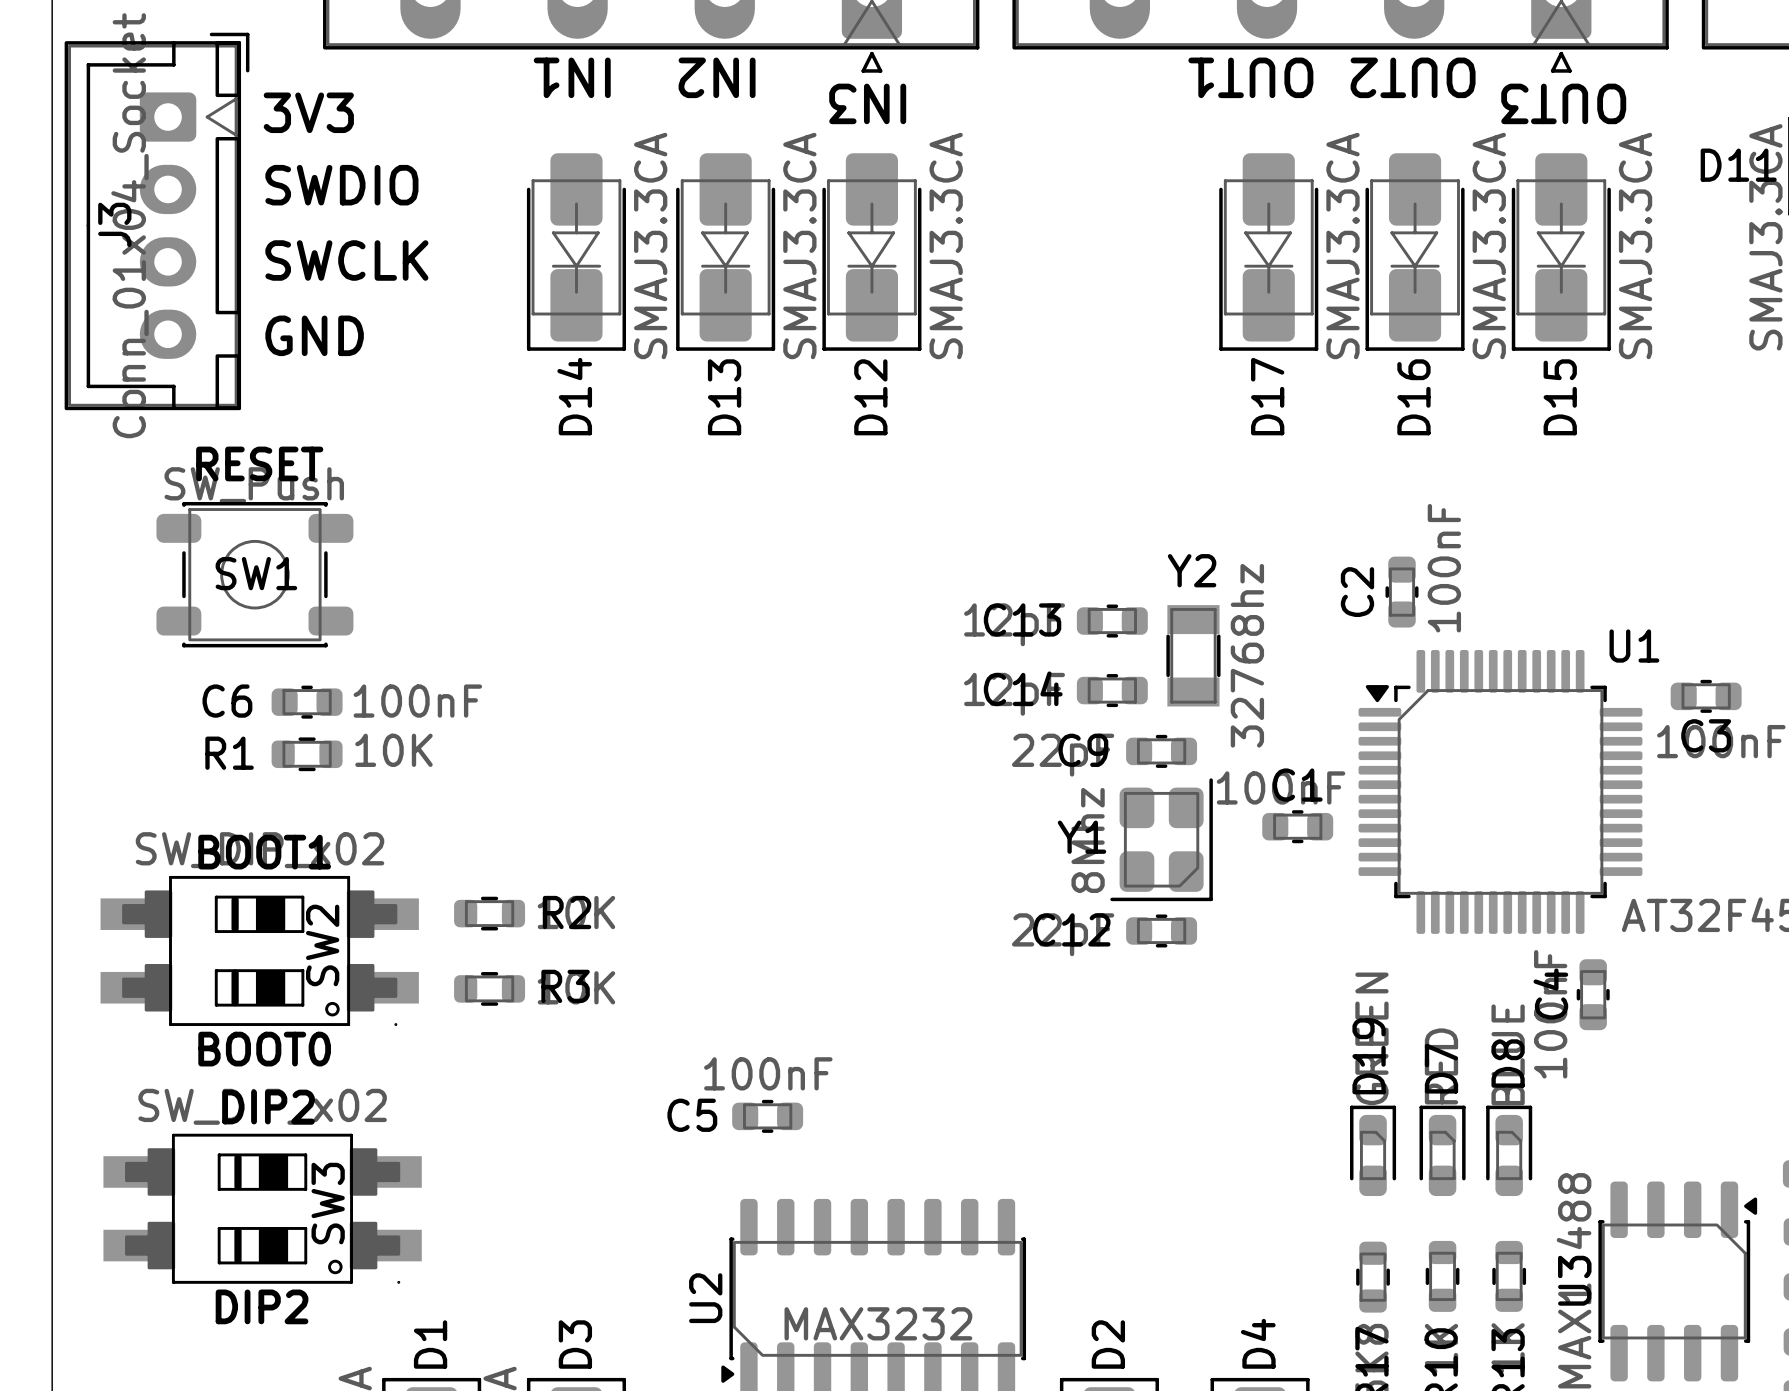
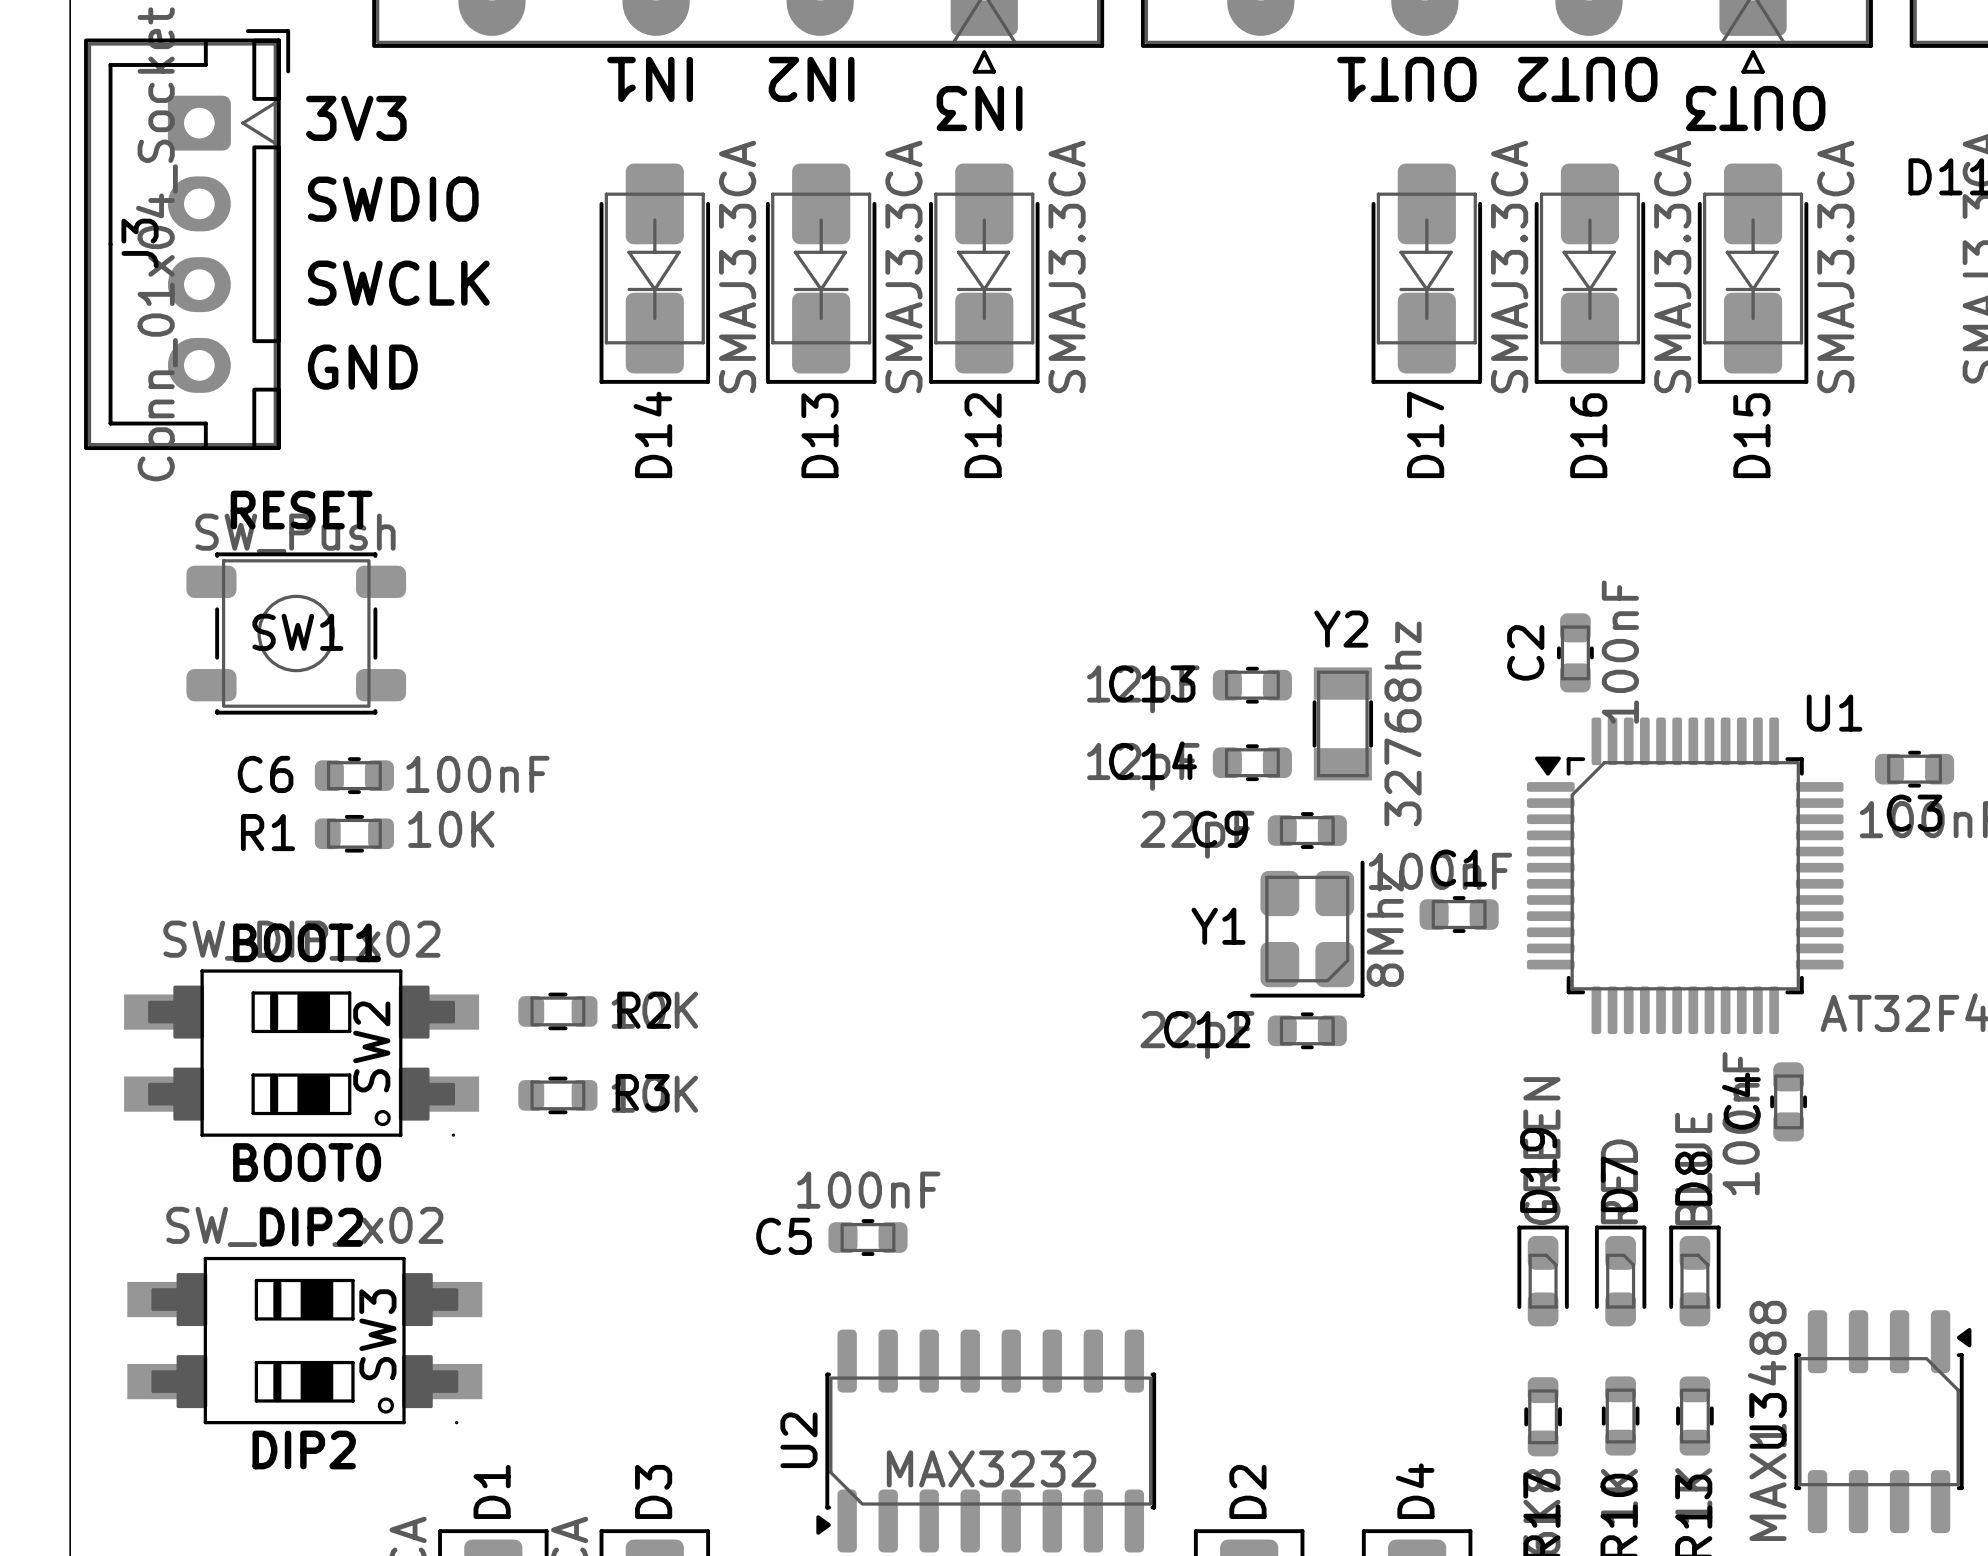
C2 value position: 100nF (1444, 568) -> 100nF (1620, 652)
Y1 value position: 8Mhz (1088, 840) -> 8Mhz (1385, 928)

